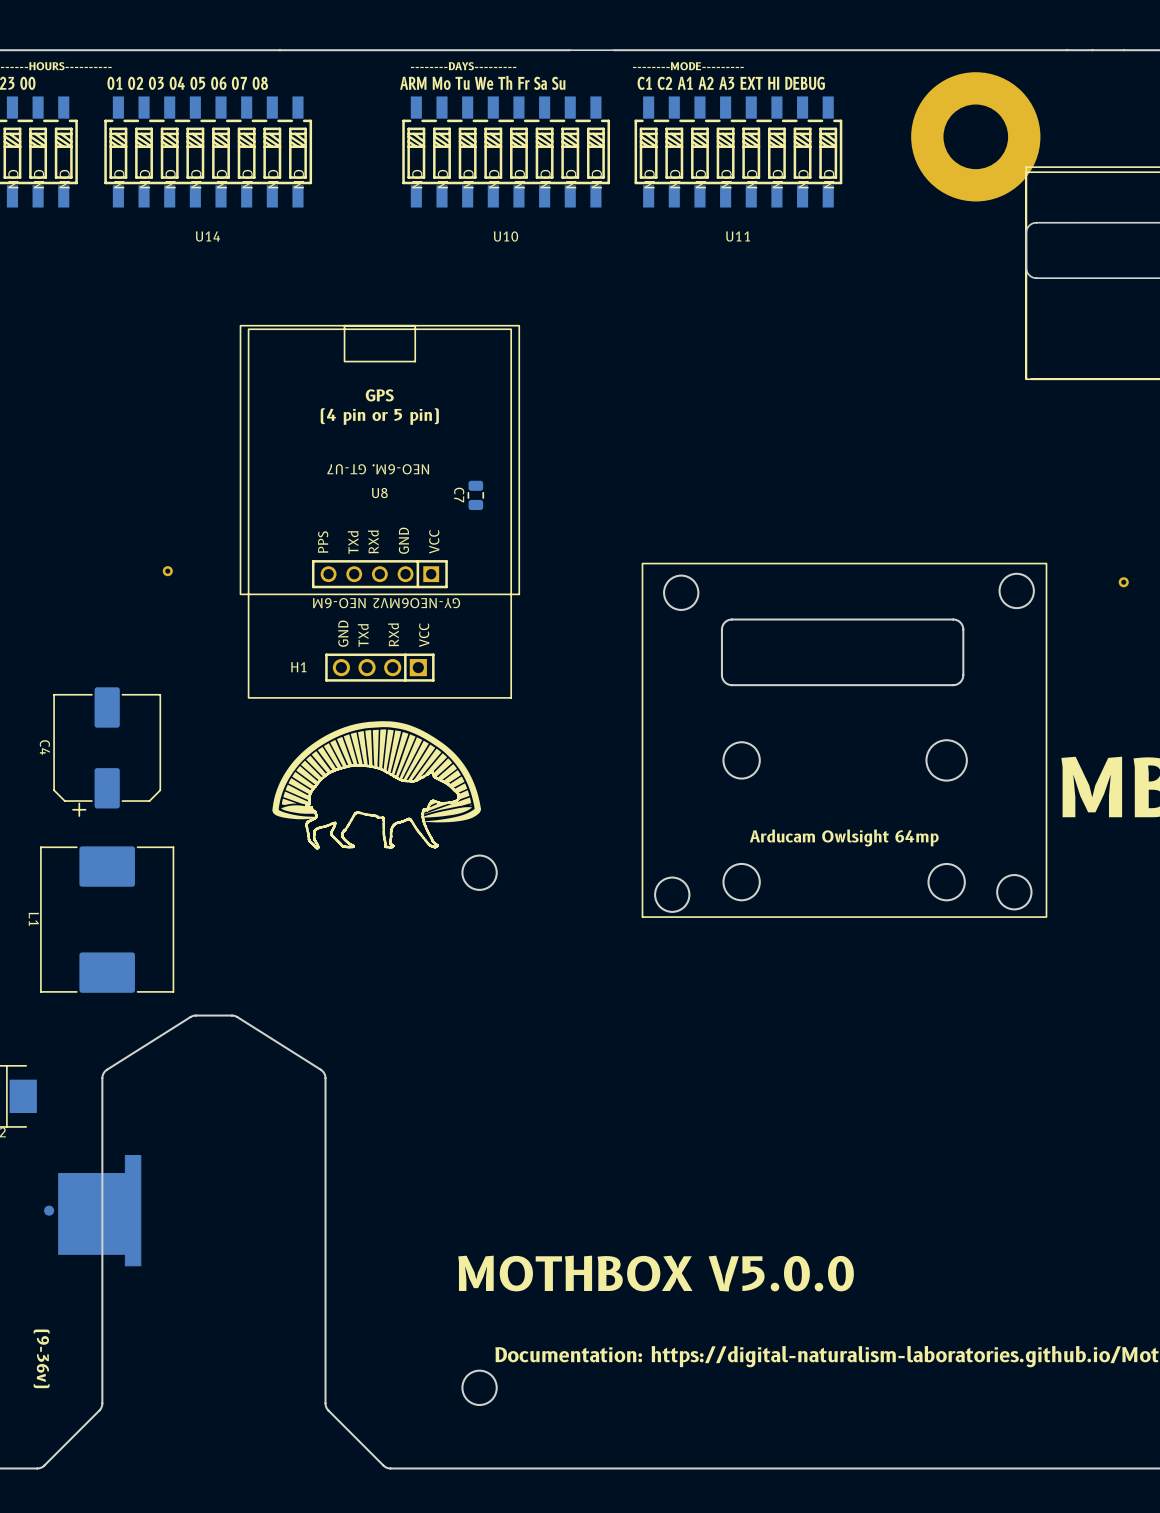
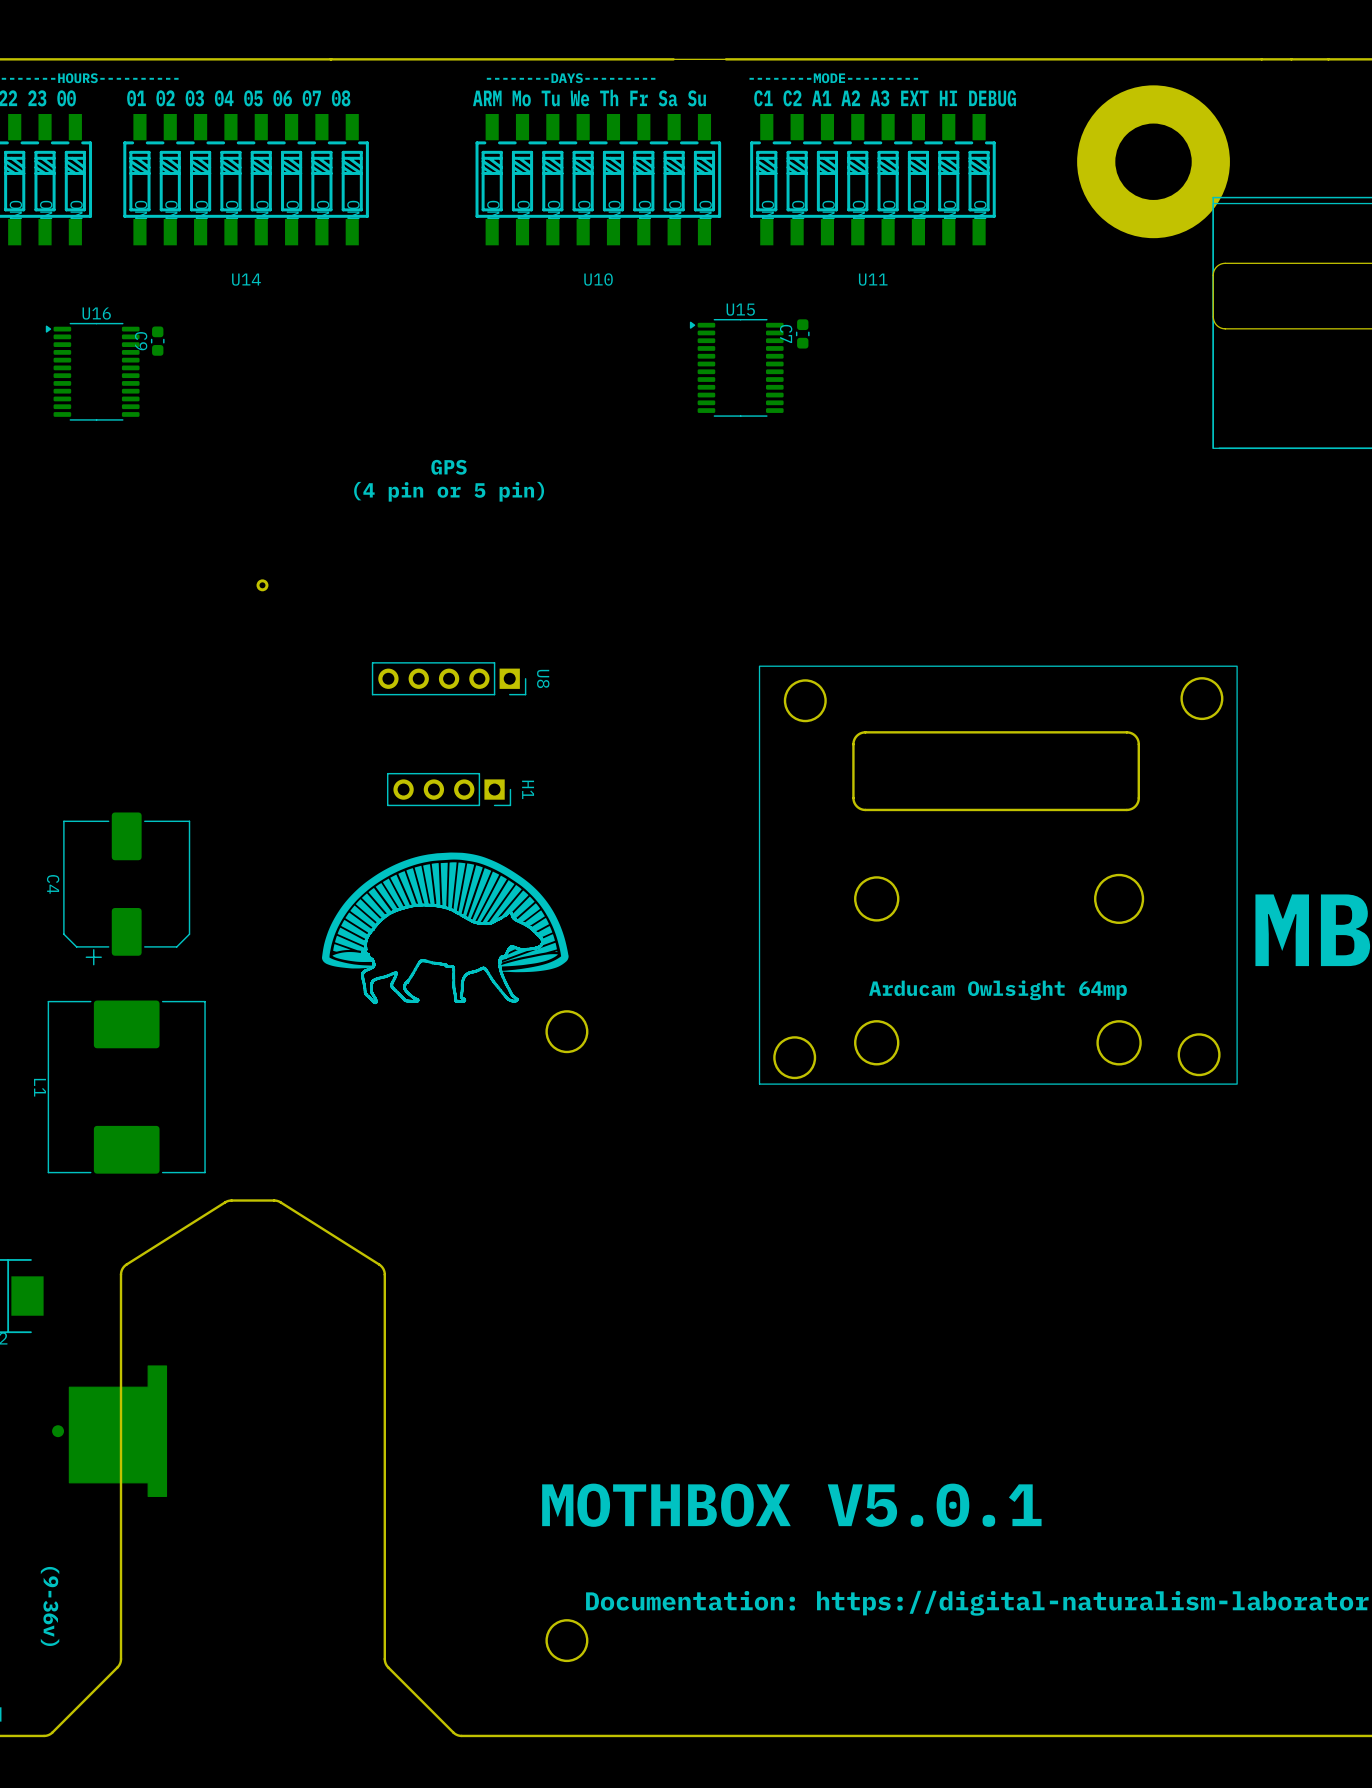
C9: none -> (157, 341)
U15: none -> (736, 367)
U16: none -> (92, 371)
U8 footprint: [240, 325, 520, 595] -> [371, 662, 527, 696]
H1 footprint: [248, 328, 512, 699] -> [386, 772, 512, 807]
C7 footprint: [467, 480, 484, 511] -> [795, 319, 810, 349]
U8 name position: U8 (379, 493) -> U8 (543, 678)
part position: (167, 571) -> (262, 585)
part: (1123, 582) -> none
H1 name position: H1 (298, 667) -> H1 (528, 789)
text: MOTHBOX V5.0.0 (656, 1273) -> MOTHBOX V5.0.1 (791, 1505)

